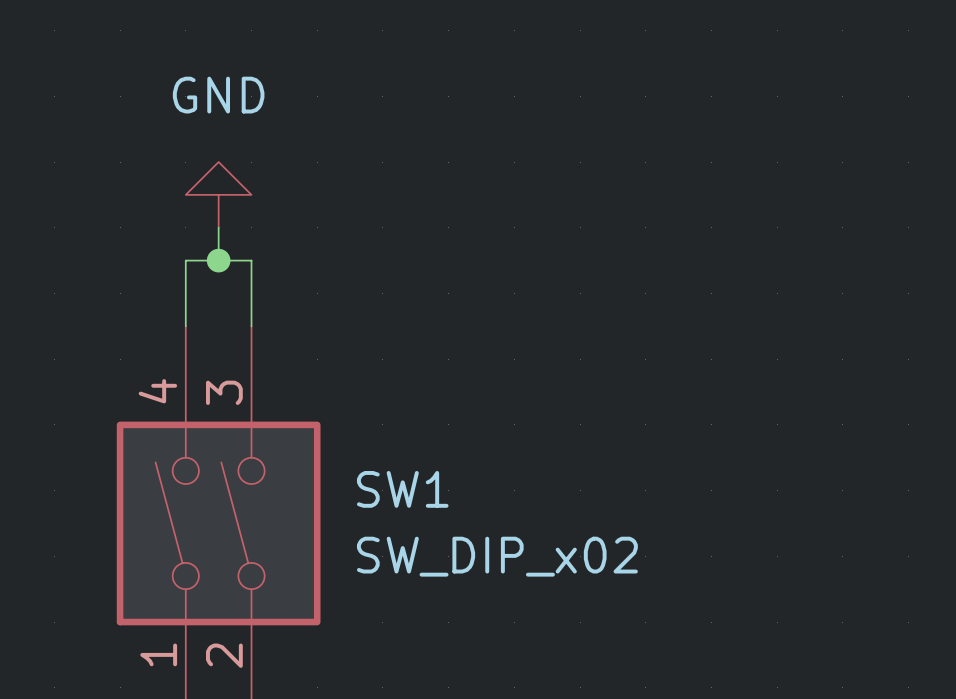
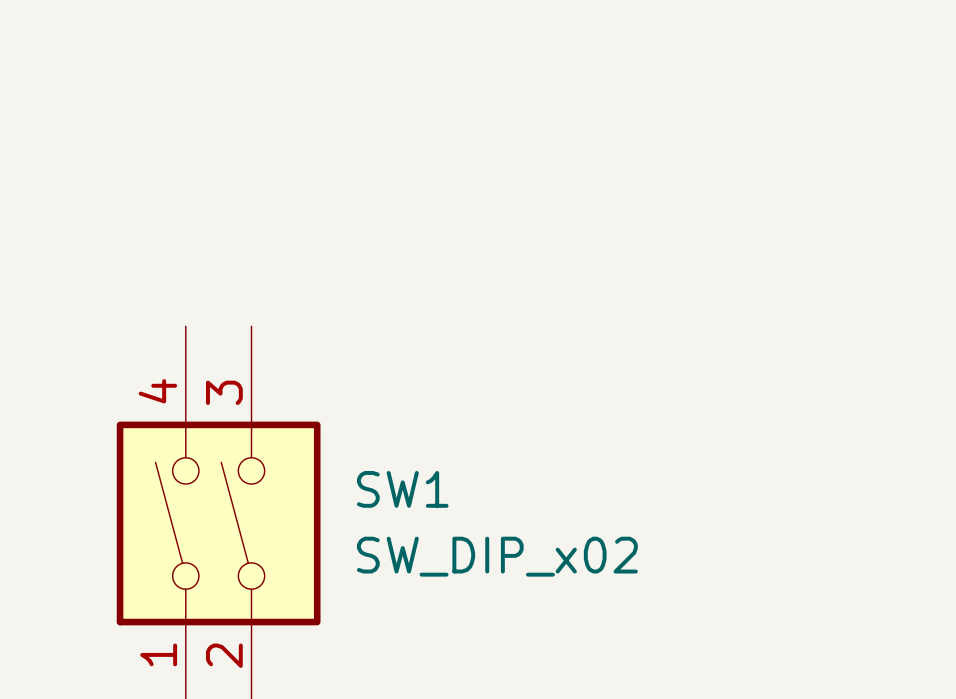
power symbol: GND (218, 194) -> none
wire: (218, 227) (218, 260) -> none
junction: (218, 260) -> none
wire: (185, 326) (185, 260) (251, 260) (251, 326) -> none

